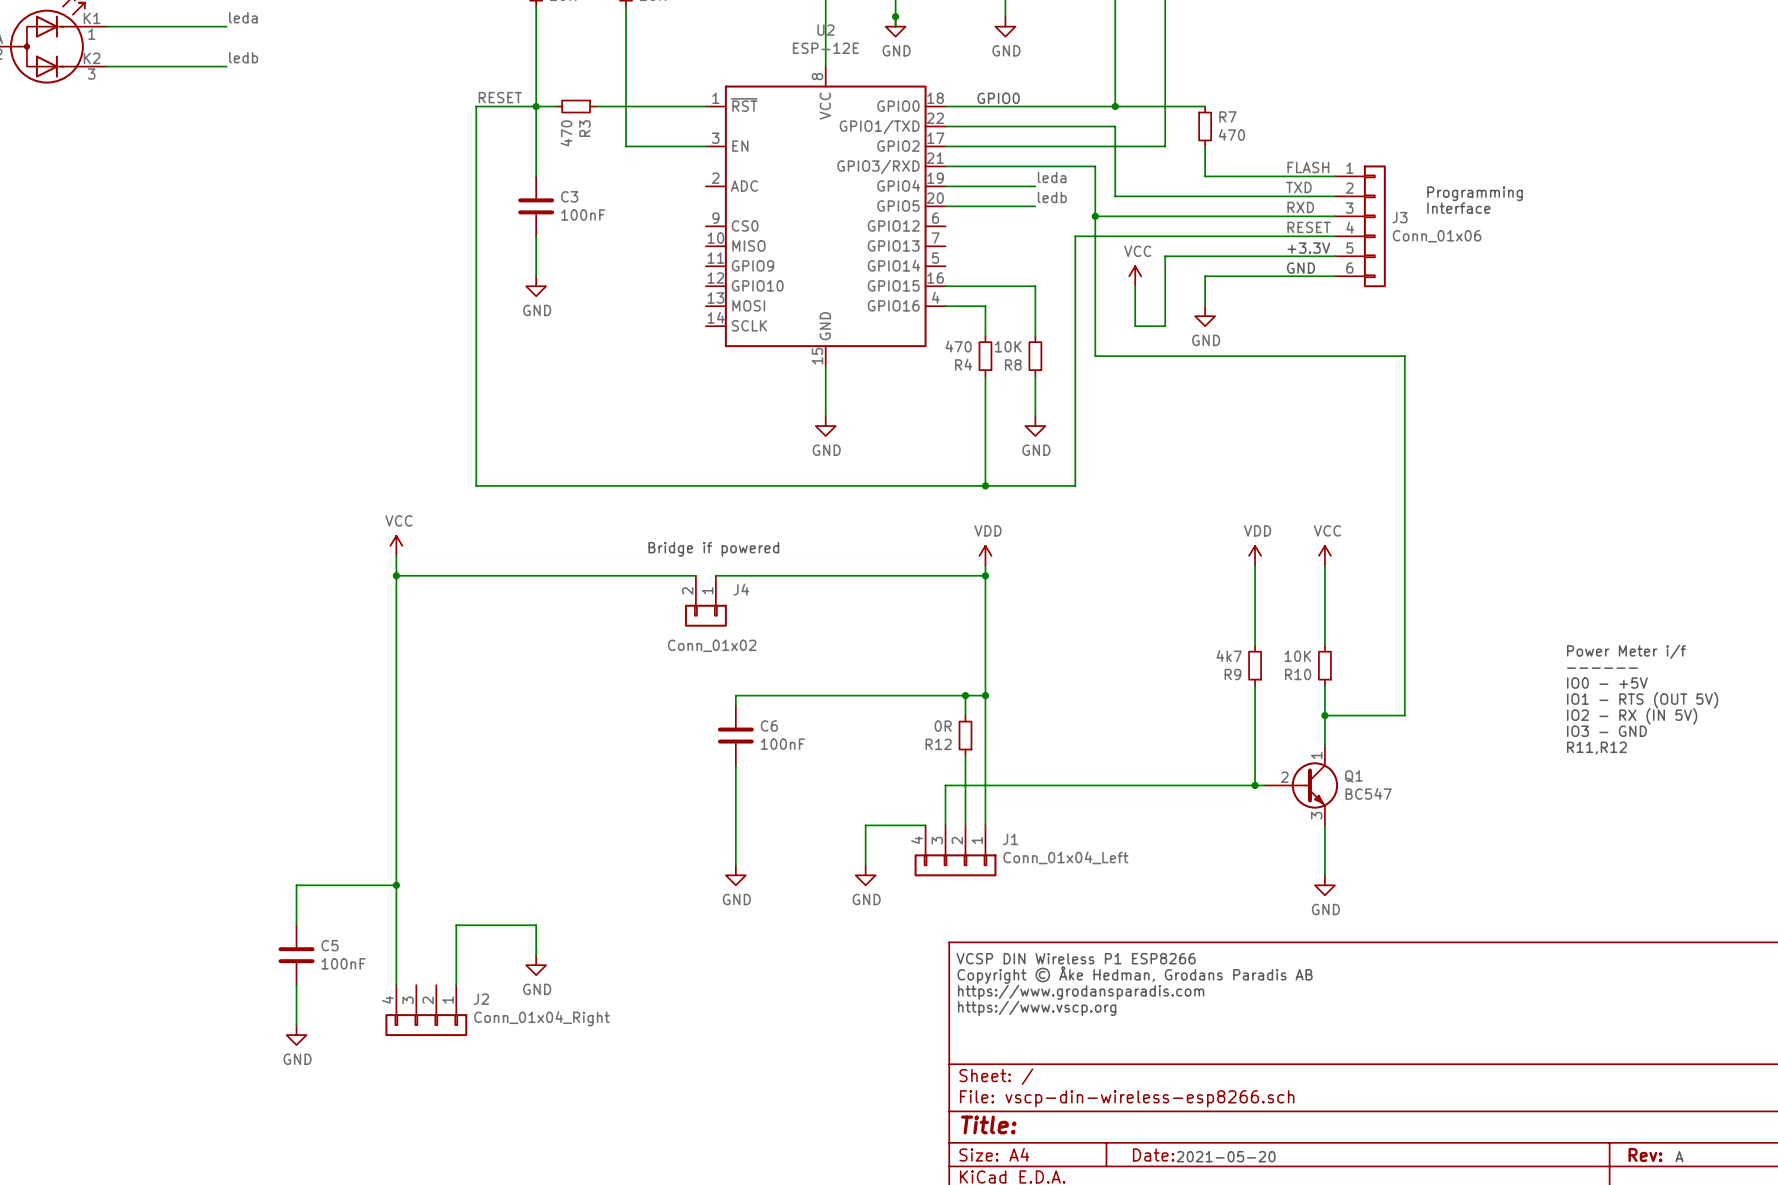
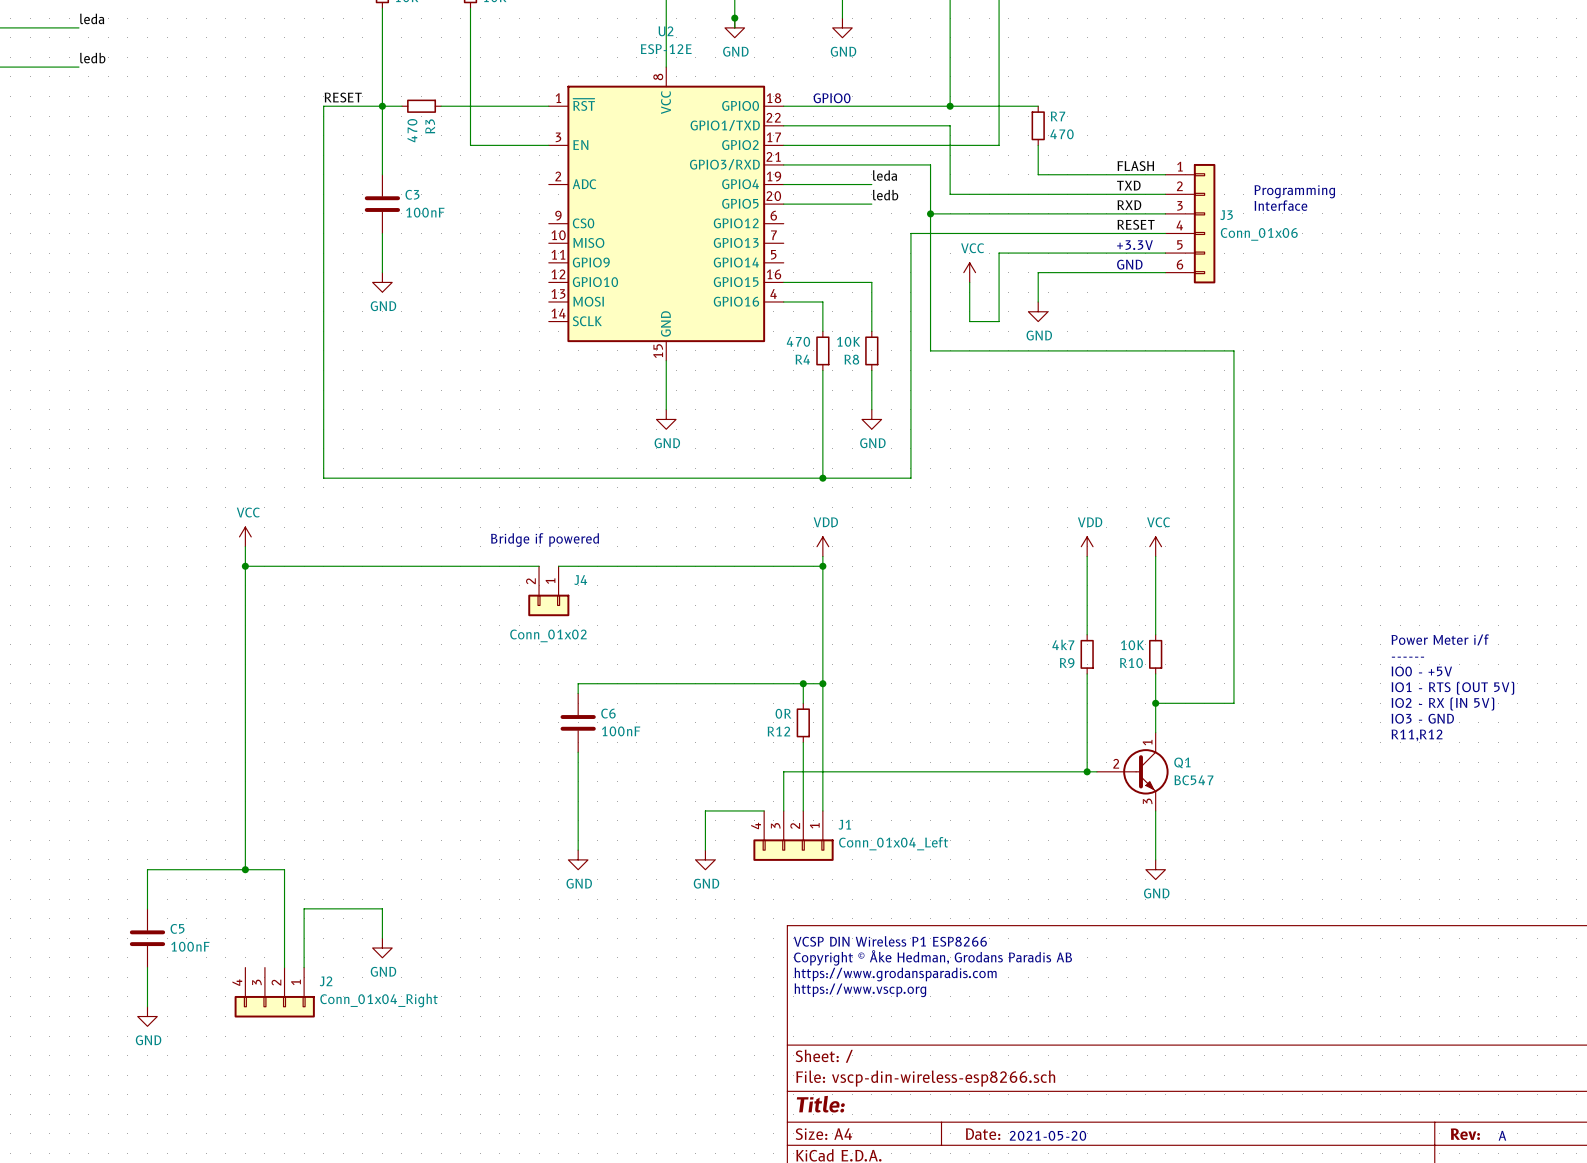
wire: (396, 885) (396, 985) -> (245, 869) (284, 869) (284, 967)

